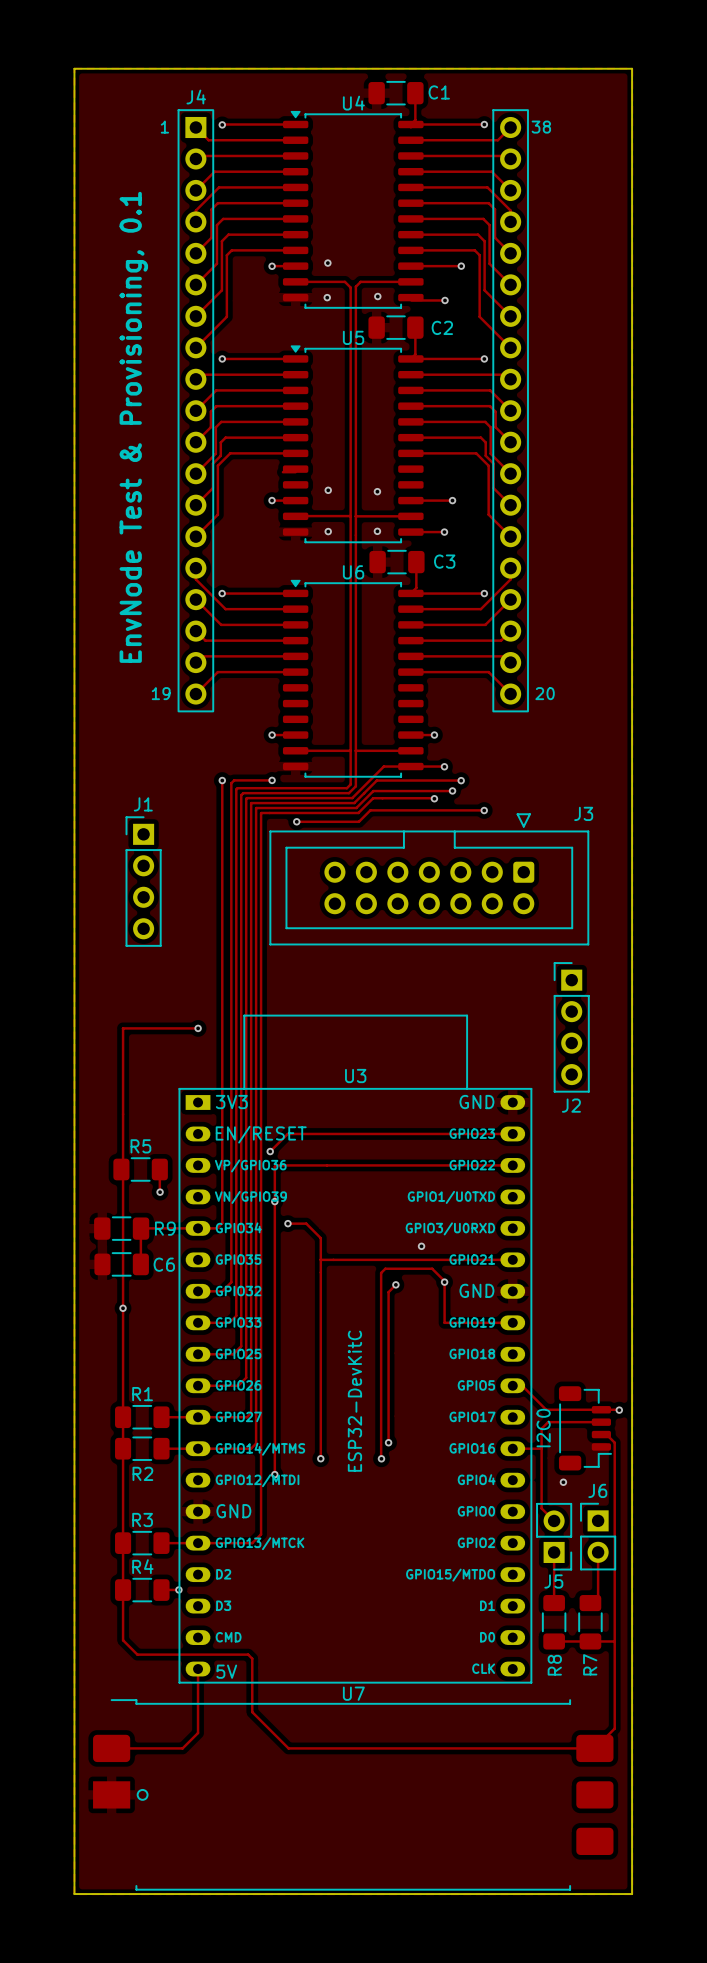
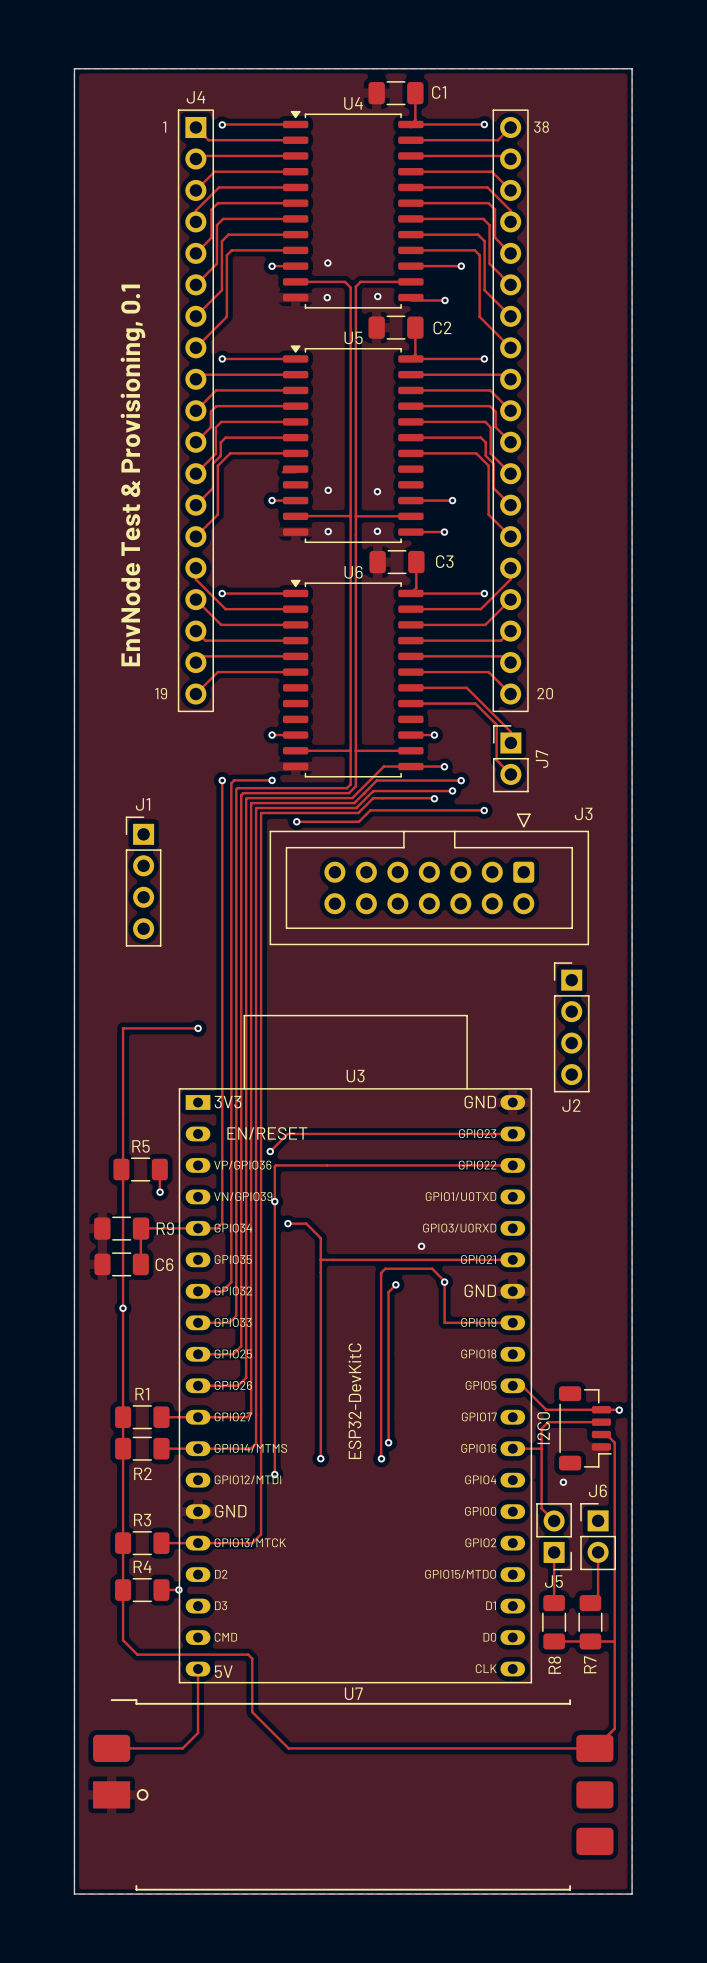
track: none -> (410, 687) (466, 687) (510, 731) (510, 742)
track: none -> (410, 703) (475, 703) (496, 724) (496, 760) (510, 774)
J7: none -> (510, 758)

